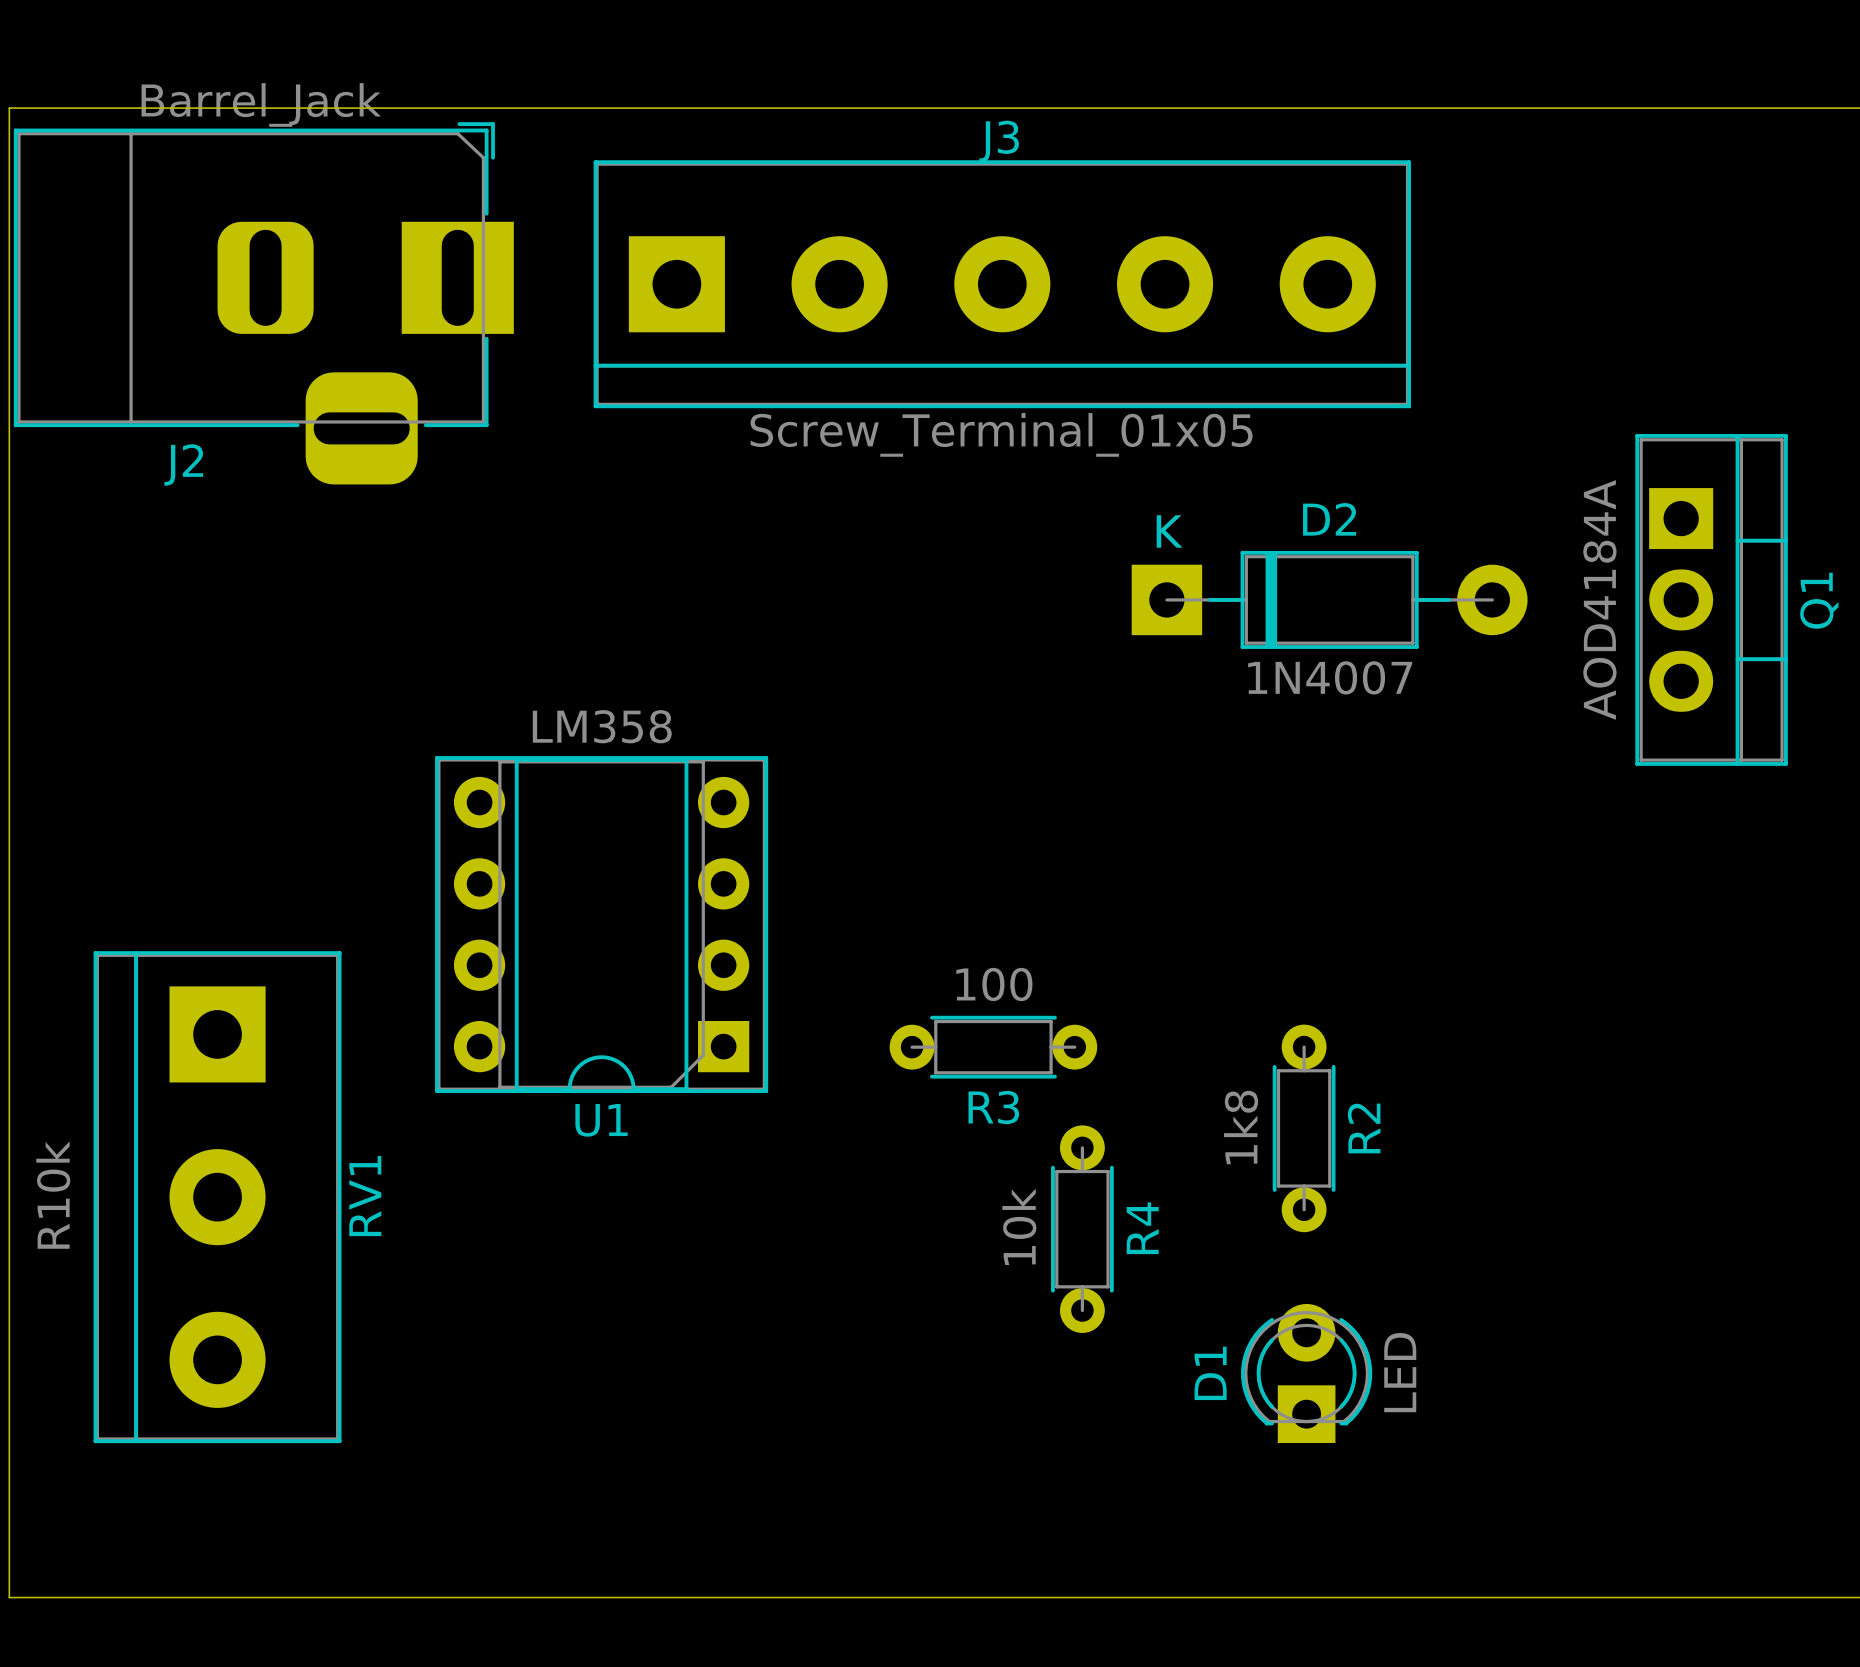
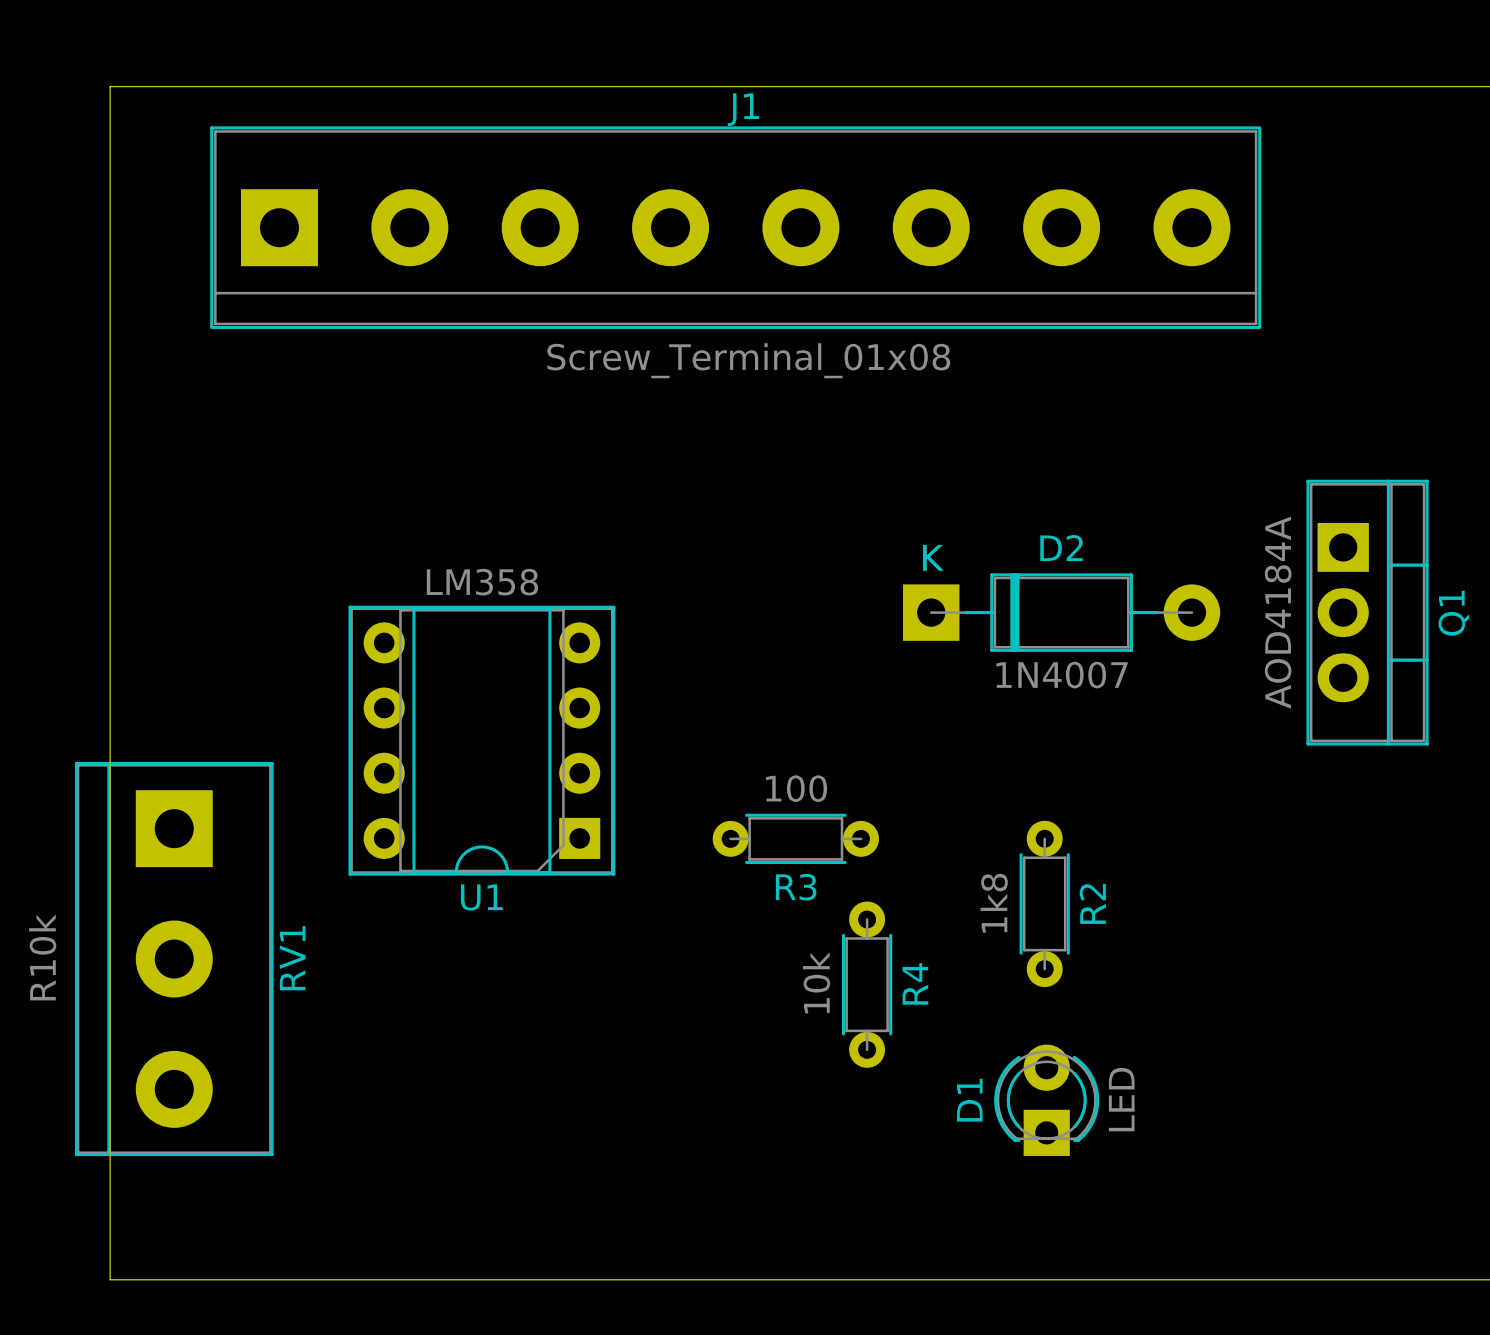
board edge: (137, 108) (9, 108) (9, 1597) (137, 1597) -> (110, 86) (110, 1279)
J1: none -> Screw_Terminal_01x08 (735, 227)
J3: Screw_Terminal_01x05 (1002, 284) -> none
J2: Barrel_Jack (263, 303) -> none
D2 position: (1329, 599) -> (1061, 612)
Q1 position: (1711, 599) -> (1367, 612)

